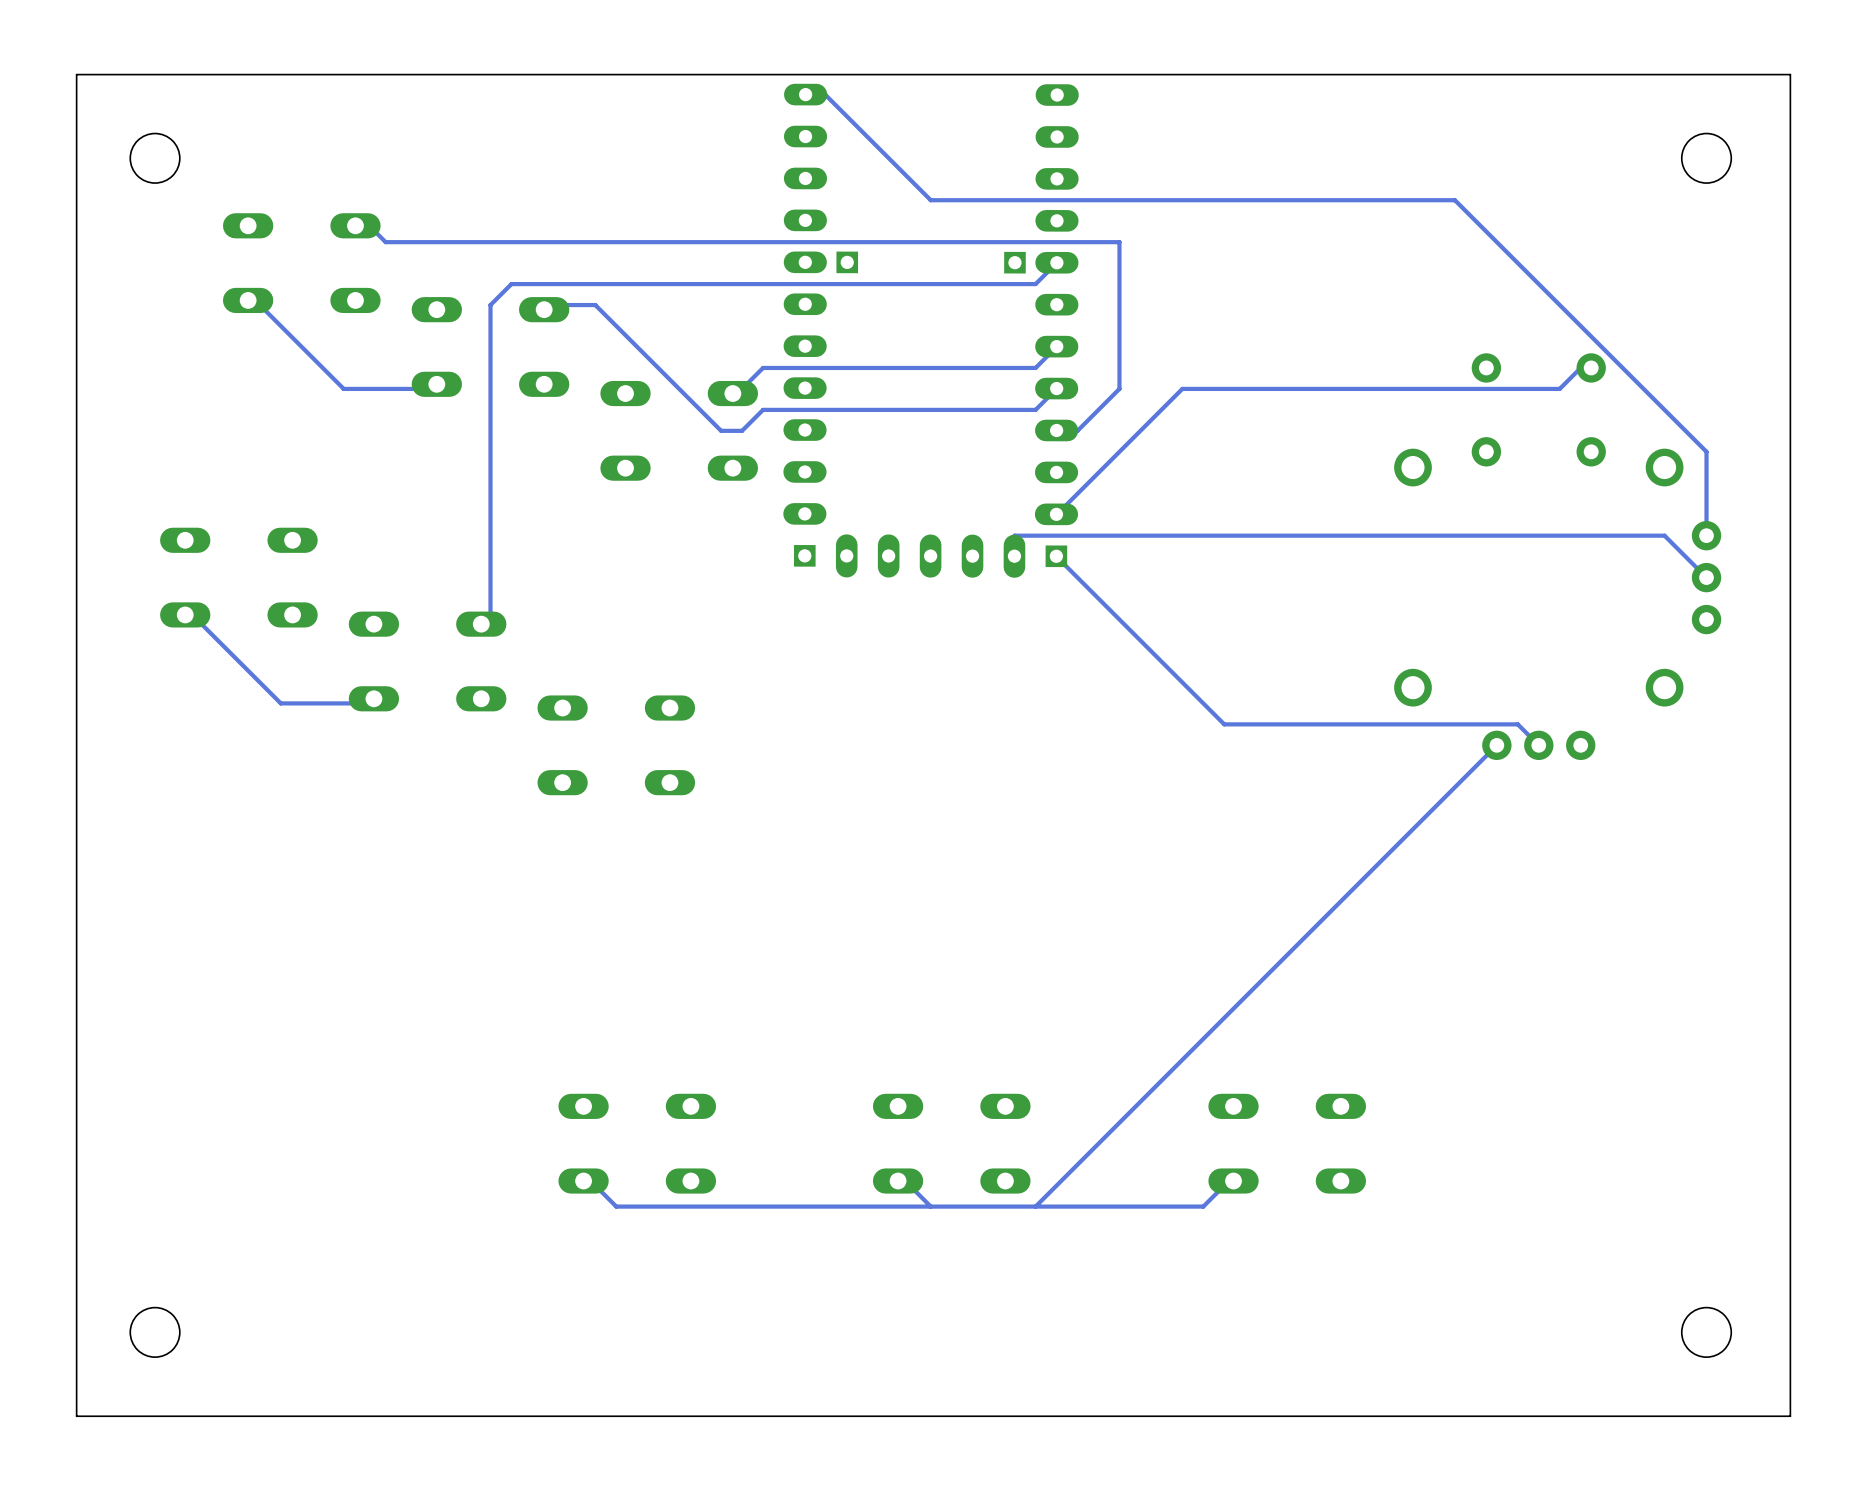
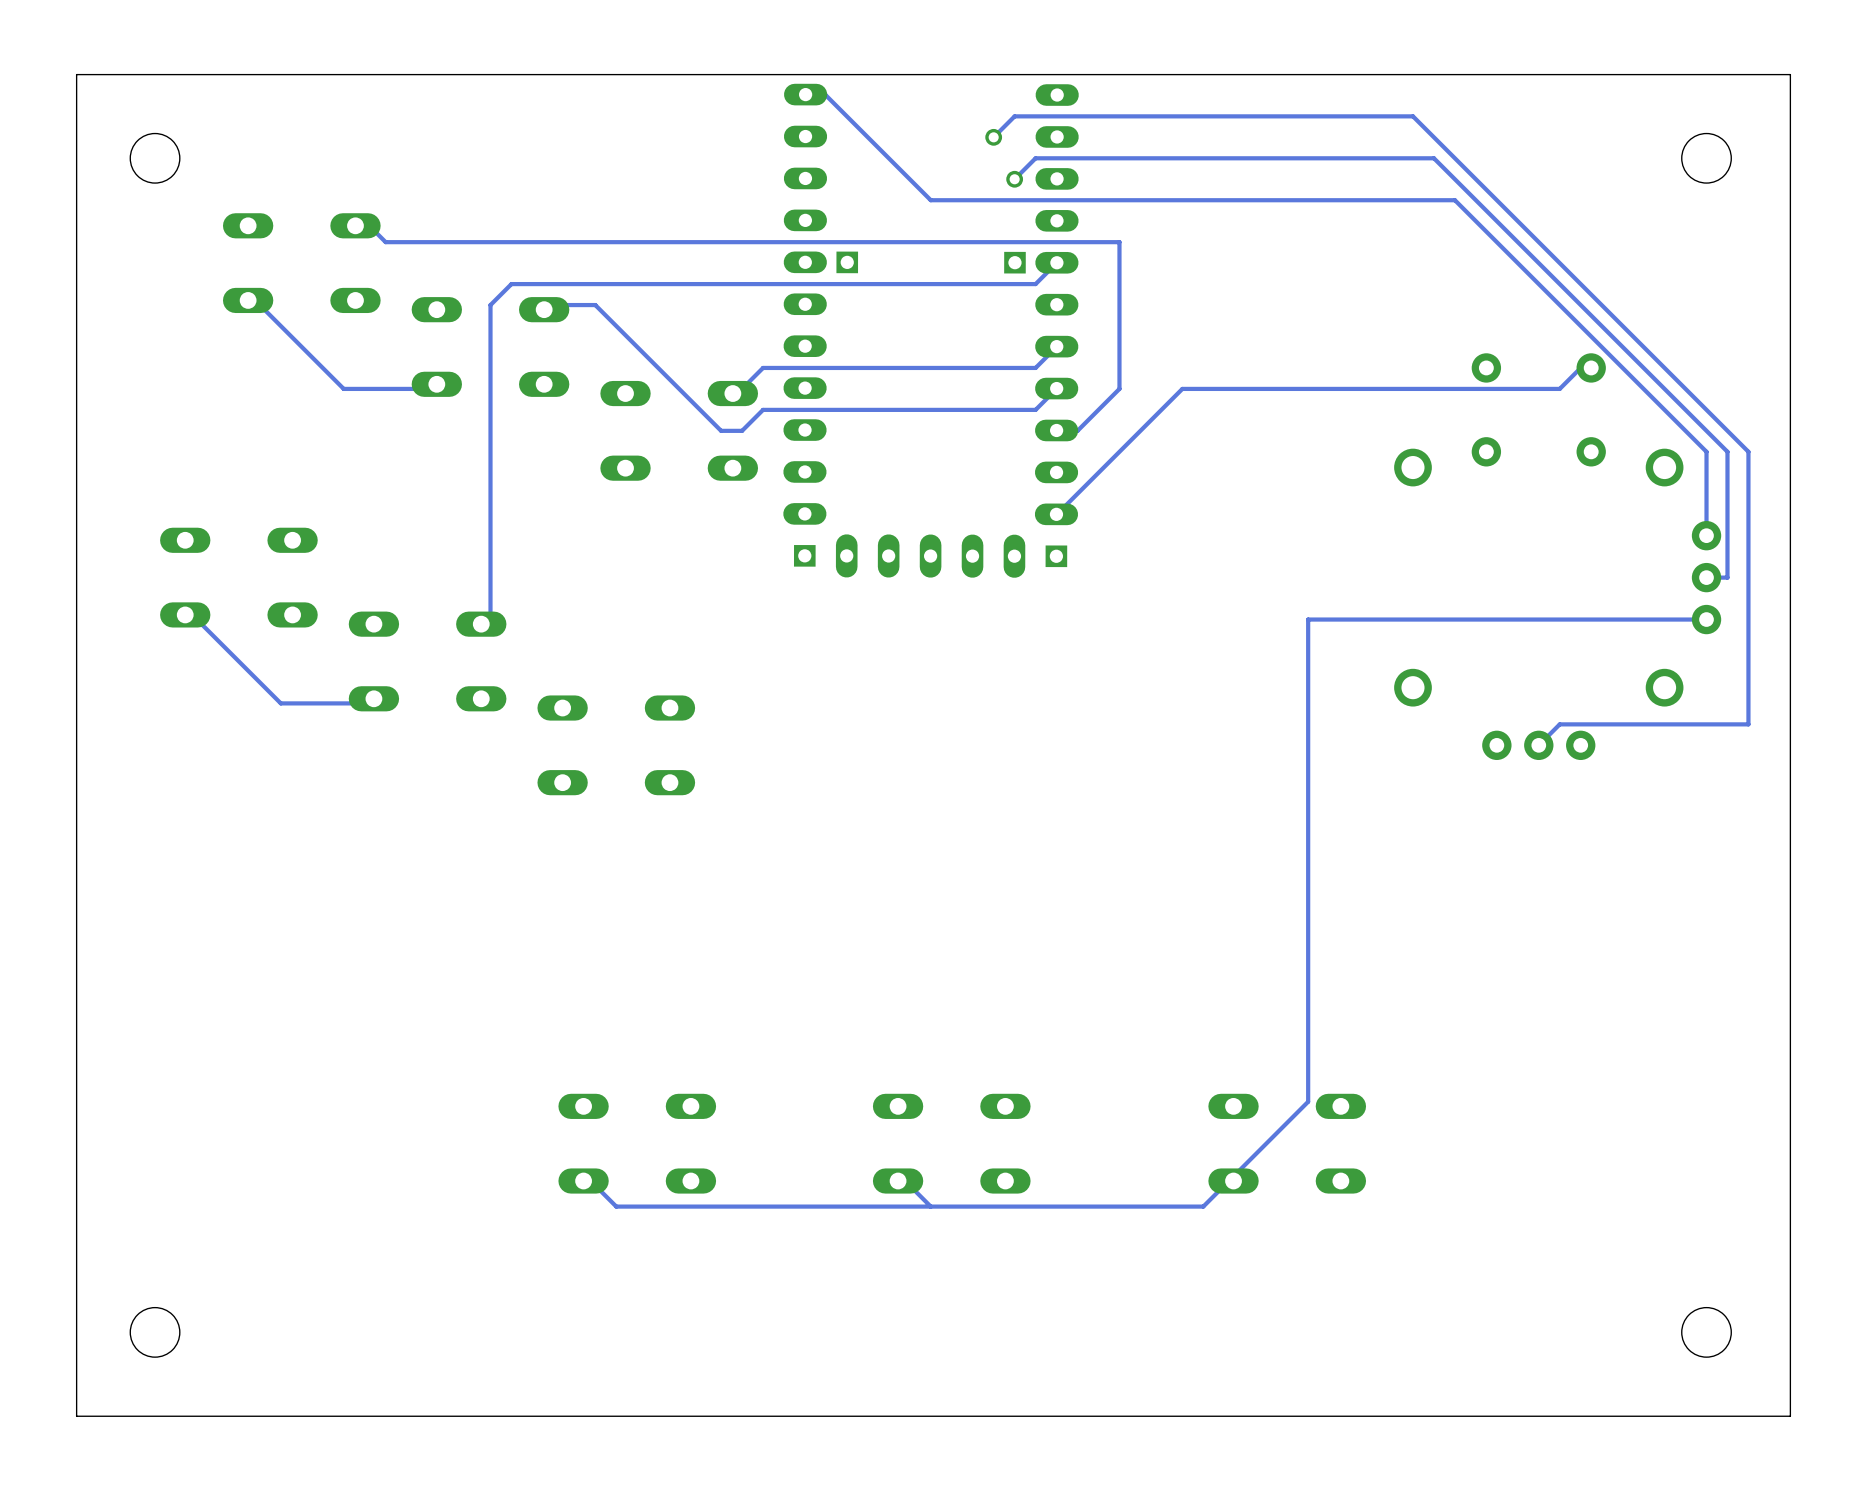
via: none -> (993, 137)
via: none -> (1014, 179)
track: (1014, 556) (1014, 535) (1664, 535) (1706, 577) -> (1014, 179) (1035, 158) (1433, 158) (1727, 451) (1727, 577) (1706, 577)
track: (1056, 556) (1224, 724) (1517, 724) (1538, 745) -> (993, 137) (1014, 116) (1412, 116) (1748, 451) (1748, 724) (1559, 724) (1538, 745)
track: none -> (1706, 619) (1308, 619) (1308, 1101) (1224, 1185)
track: (1496, 745) (1035, 1206) -> none

